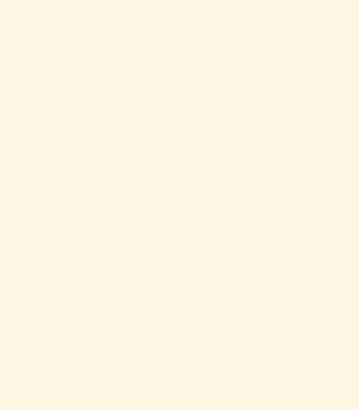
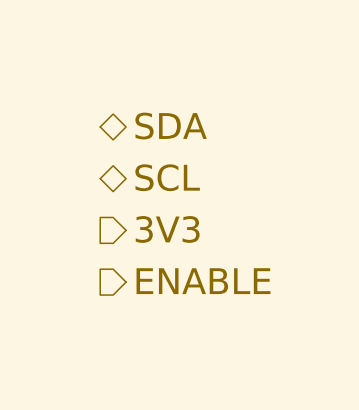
hierarchical label: none -> SDA (171, 126)
hierarchical label: none -> SCL (167, 177)
hierarchical label: none -> 3V3 (167, 229)
hierarchical label: none -> ENABLE (203, 281)

